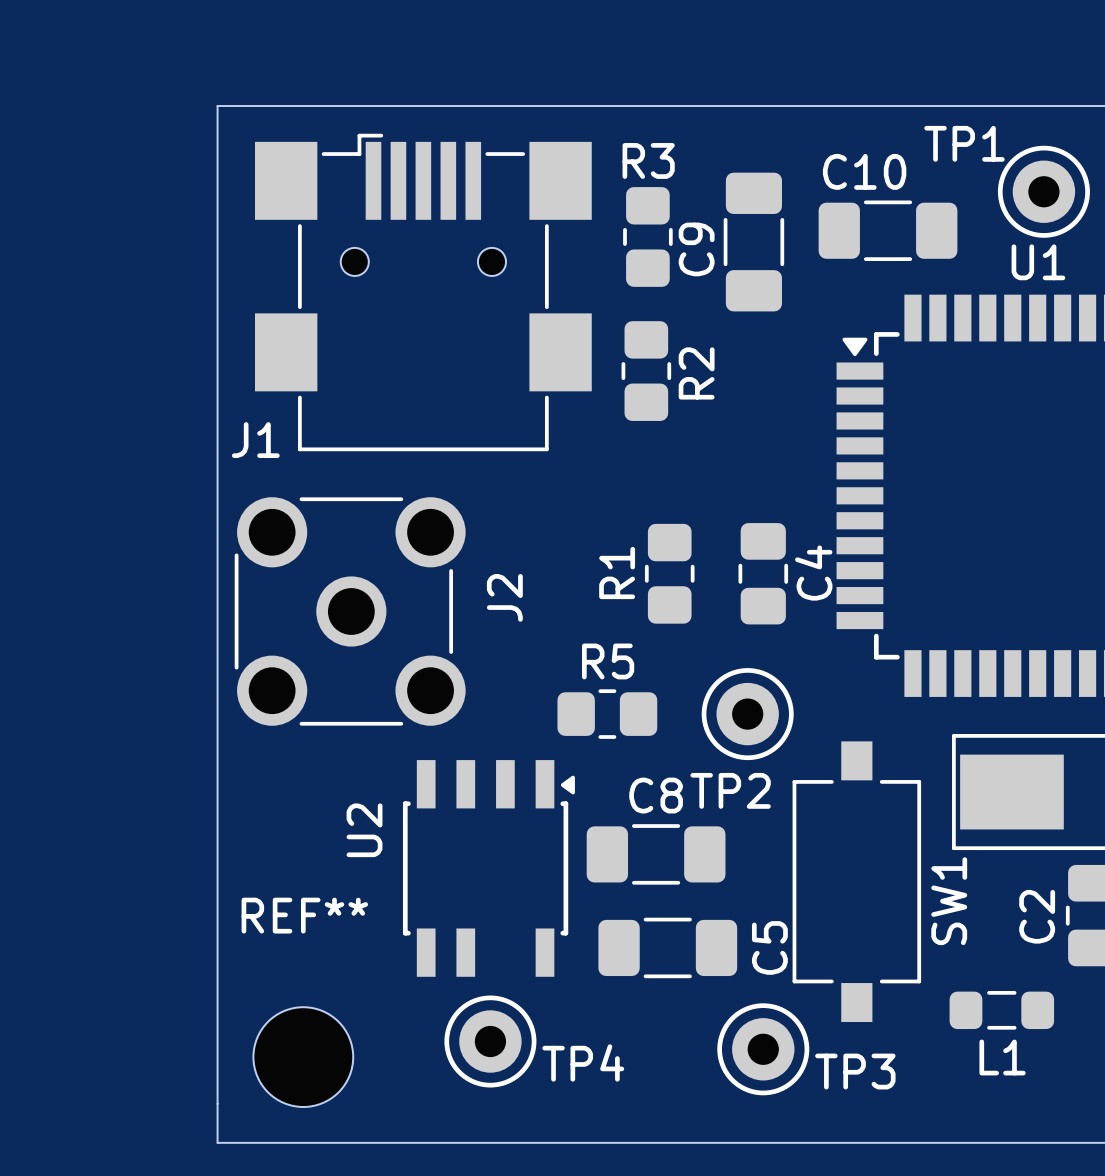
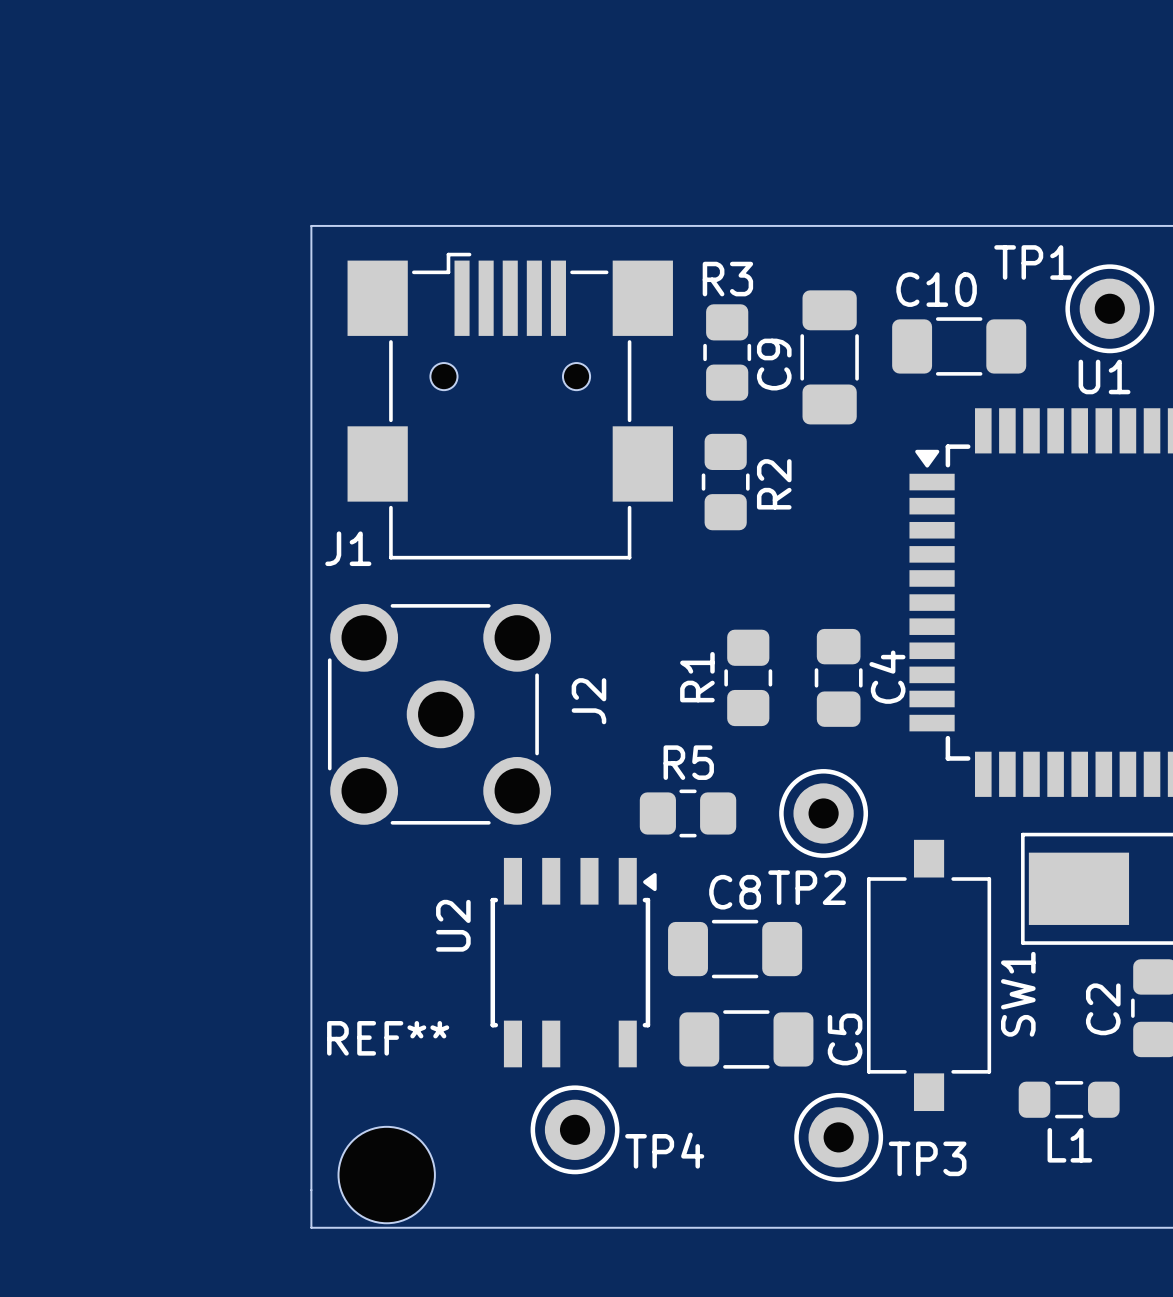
REF** position: (303, 1057) -> (386, 1175)

